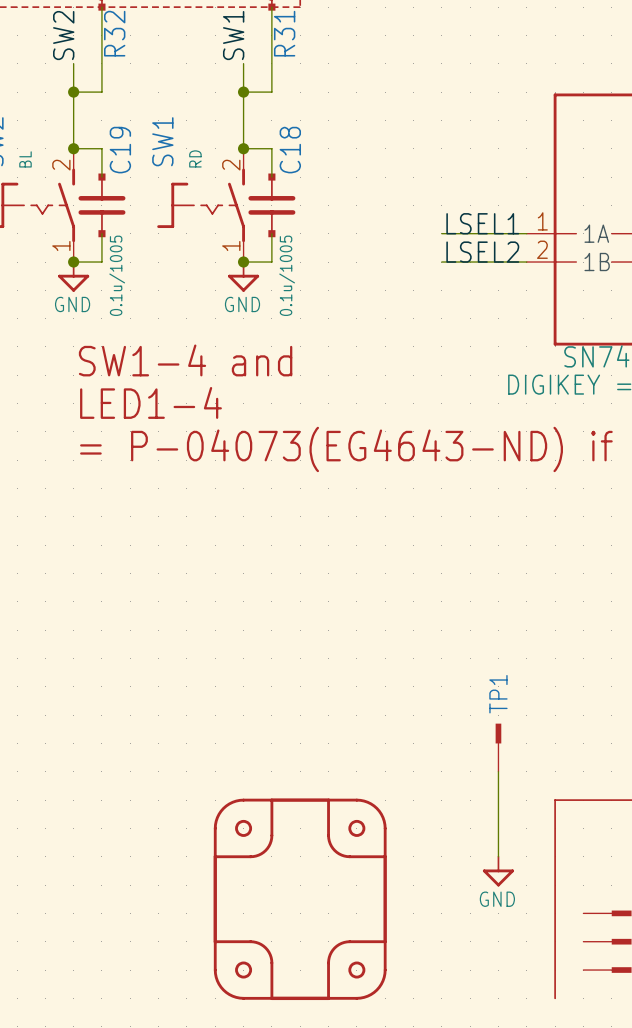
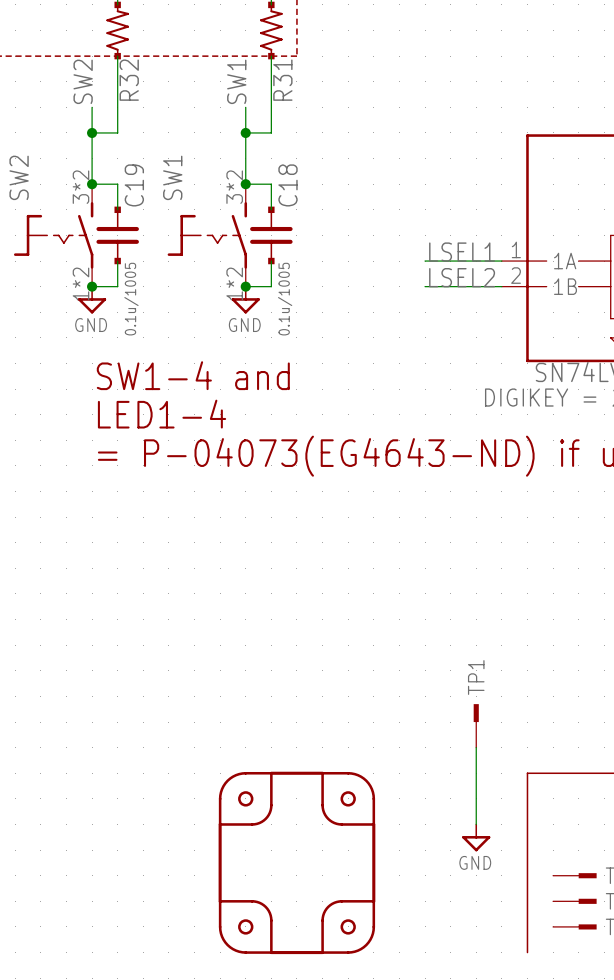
SW1 value: RD (195, 158) -> none
SW2 value: BL (25, 159) -> none
SW2 pin number: 2 (61, 165) -> 3*2 (80, 187)
SW1 pin number: 2 (231, 165) -> 3*2 (234, 187)
SW2 pin number: 1 (61, 245) -> 1*2 (80, 284)
SW1 pin number: 1 (231, 245) -> 1*2 (234, 284)

